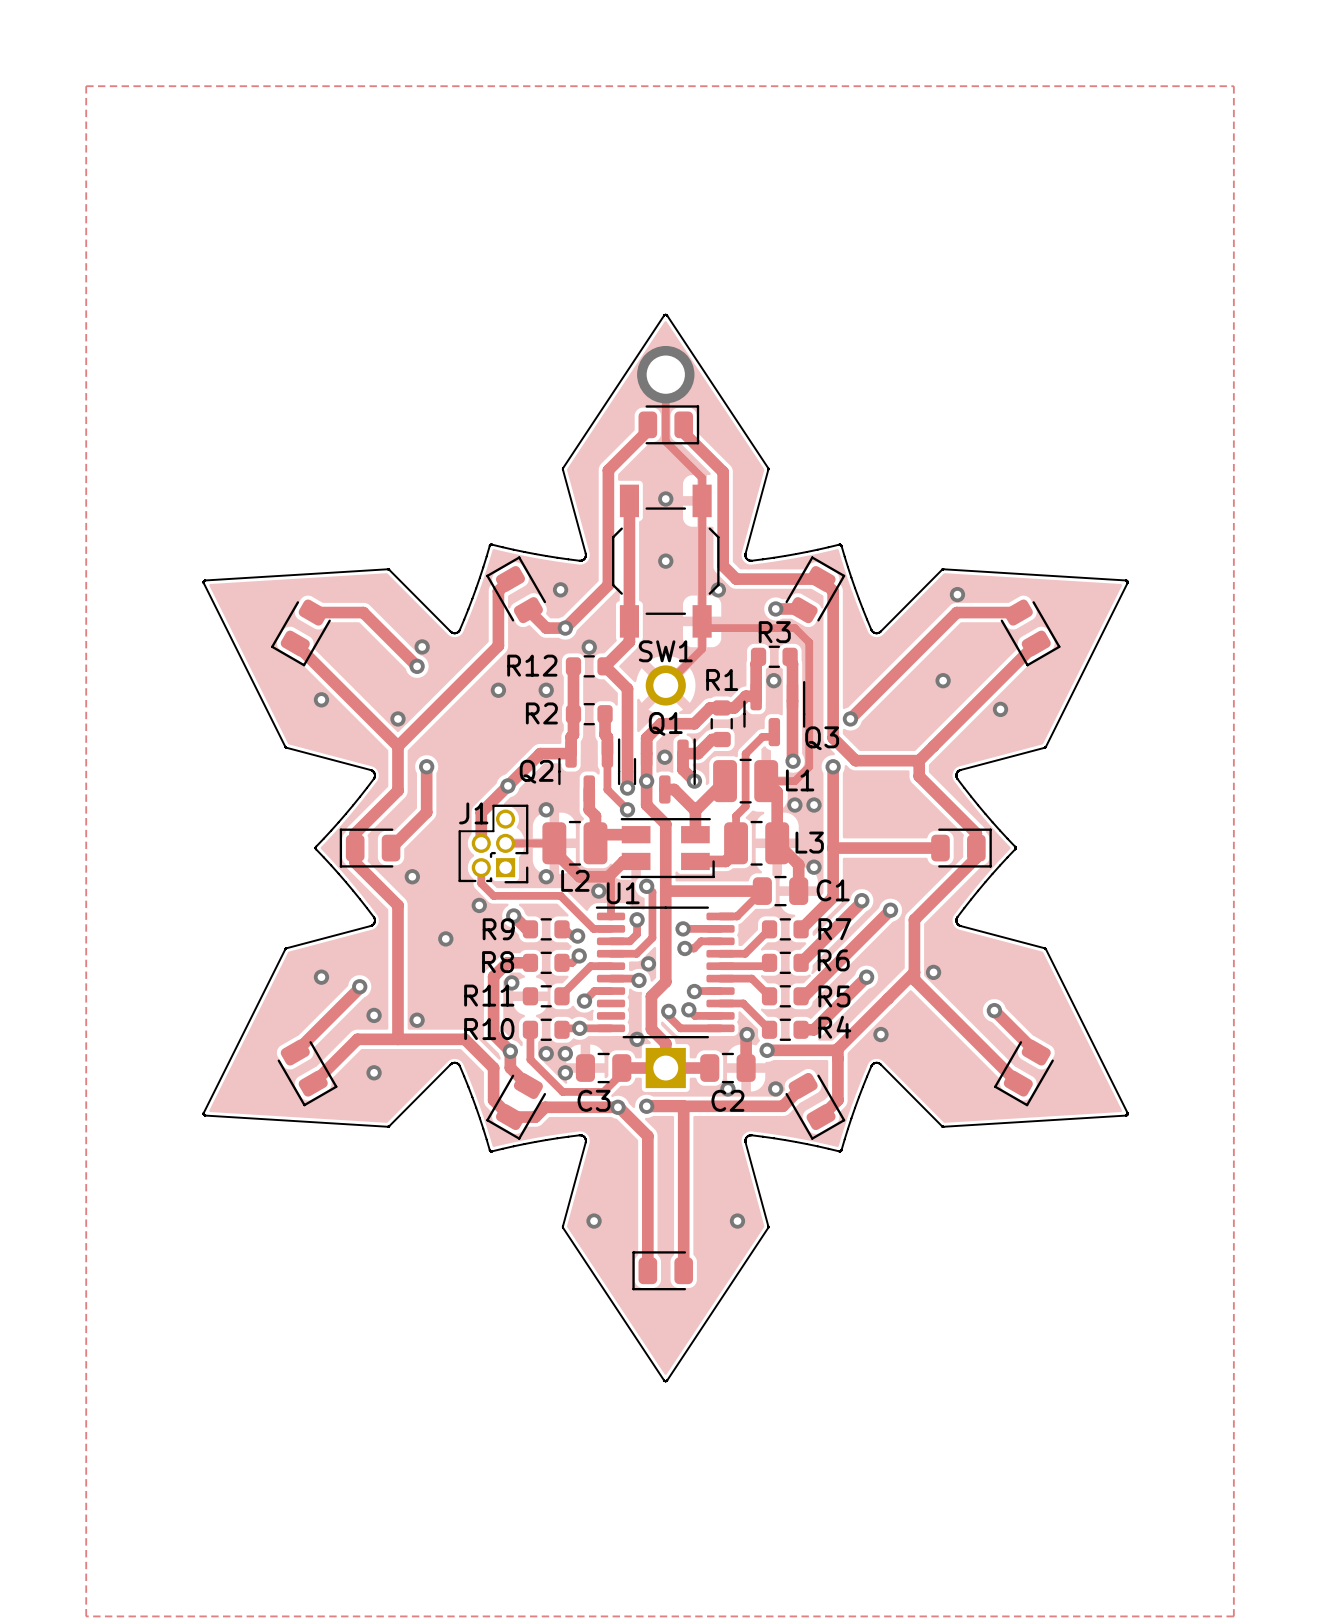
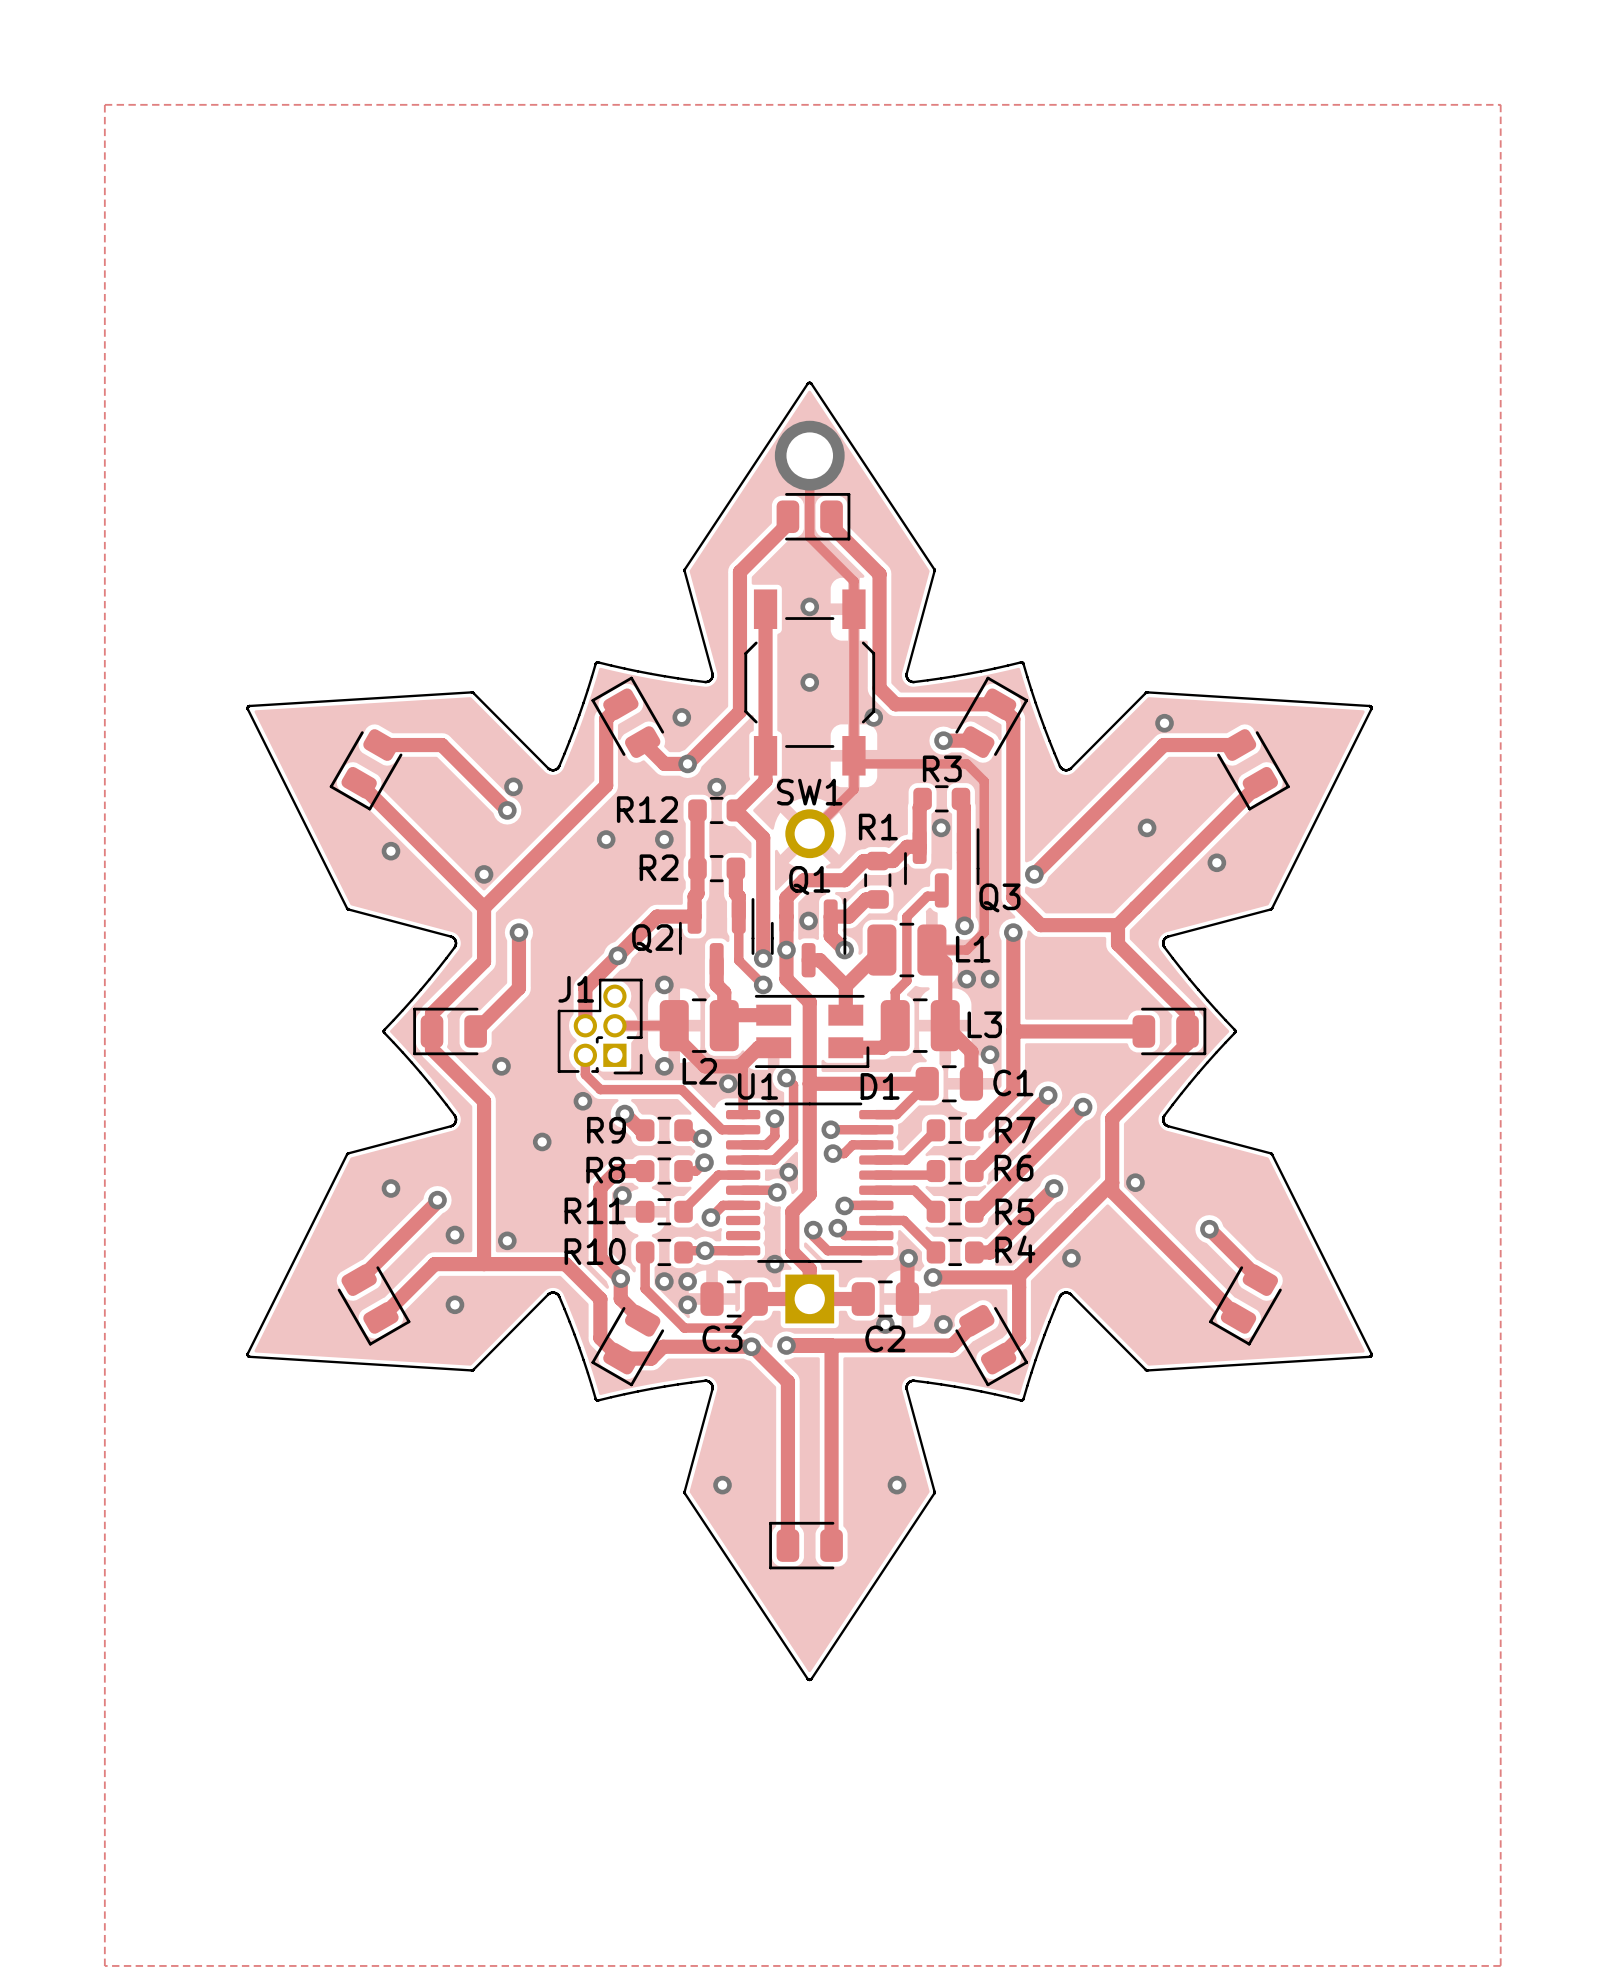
D1 name: none -> D1 (880, 1086)

